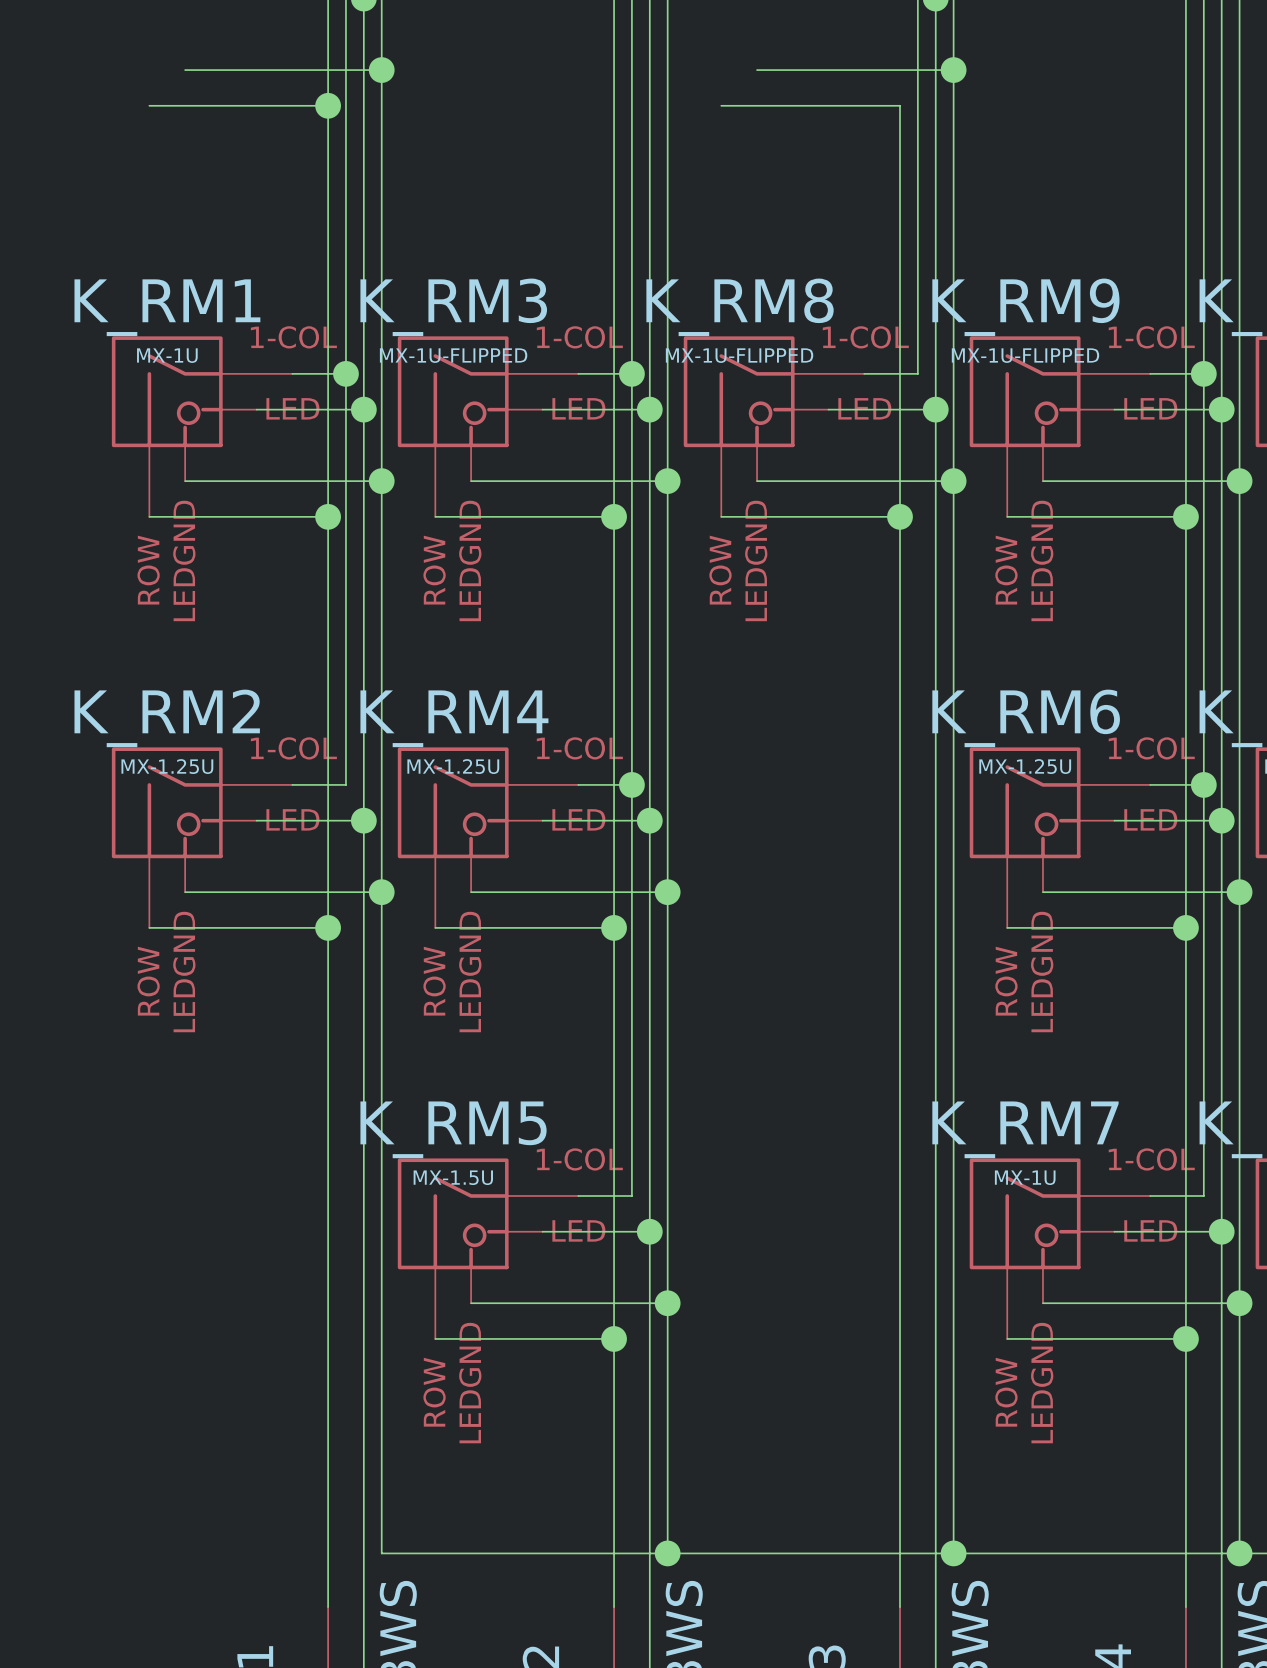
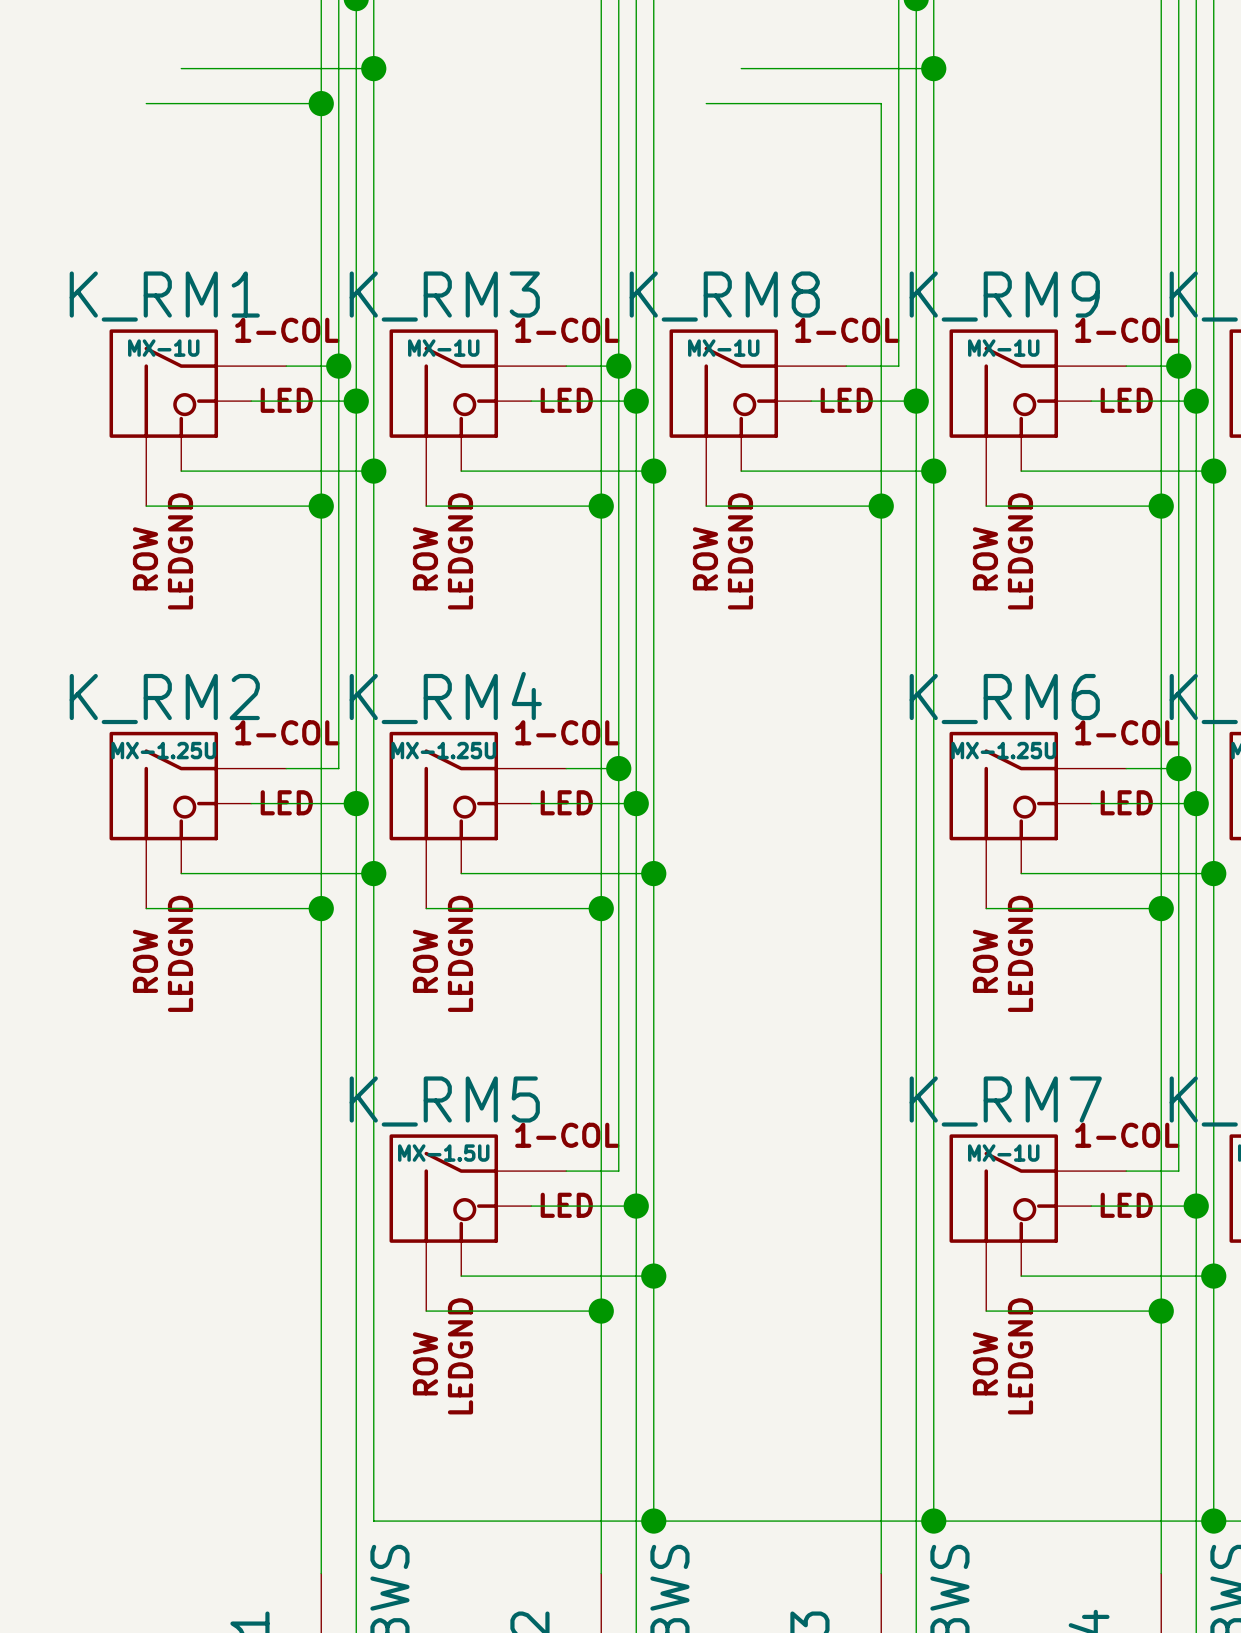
K_RM3 value: MX-1U-FLIPPED (453, 355) -> MX-1U (443, 348)
K_RM8 value: MX-1U-FLIPPED (739, 355) -> MX-1U (723, 348)
K_RM9 value: MX-1U-FLIPPED (1025, 355) -> MX-1U (1003, 348)

